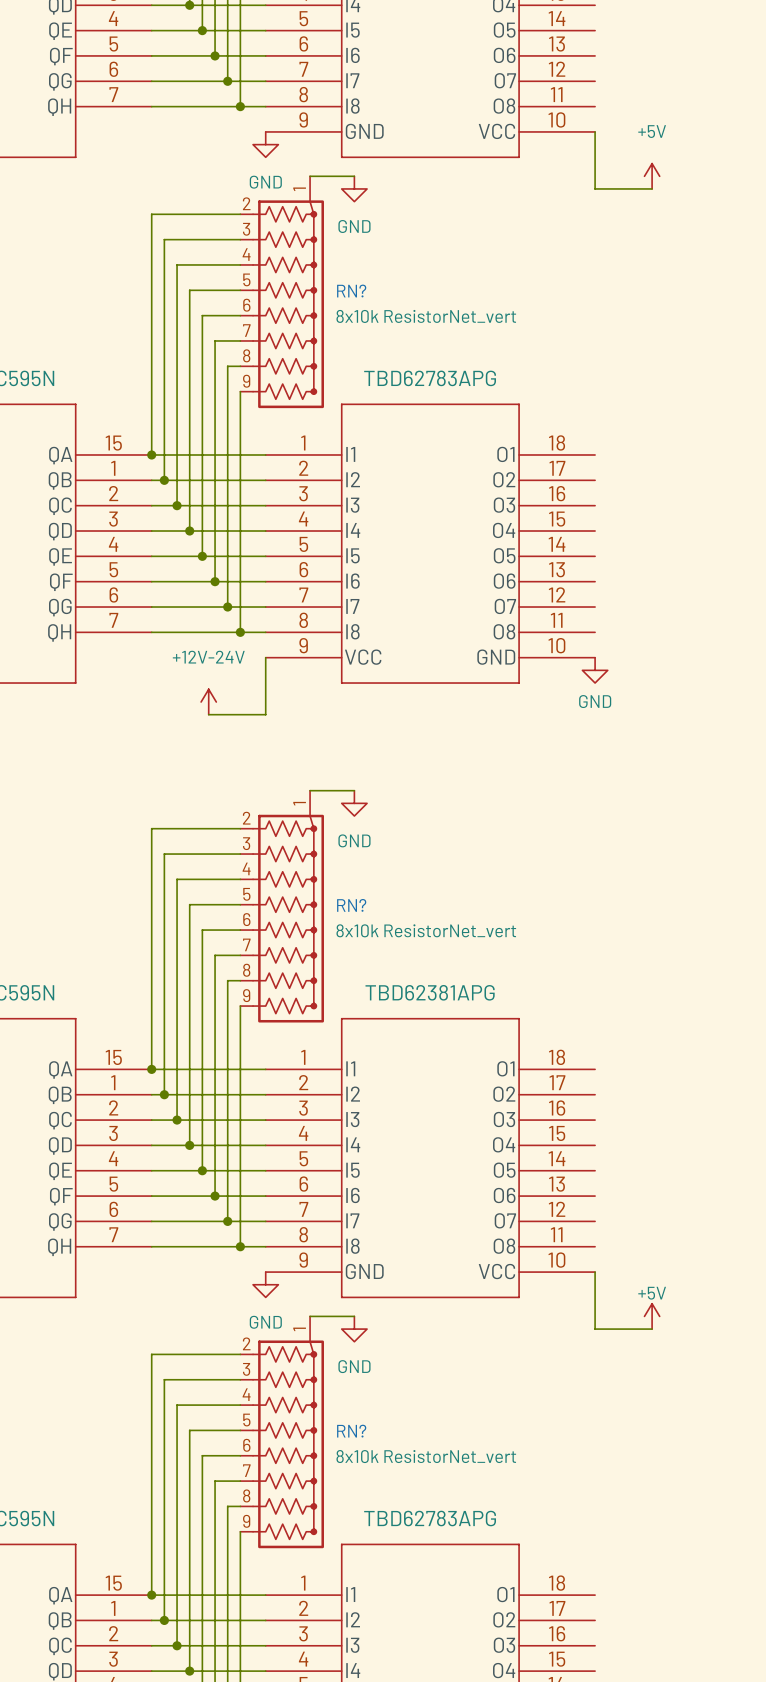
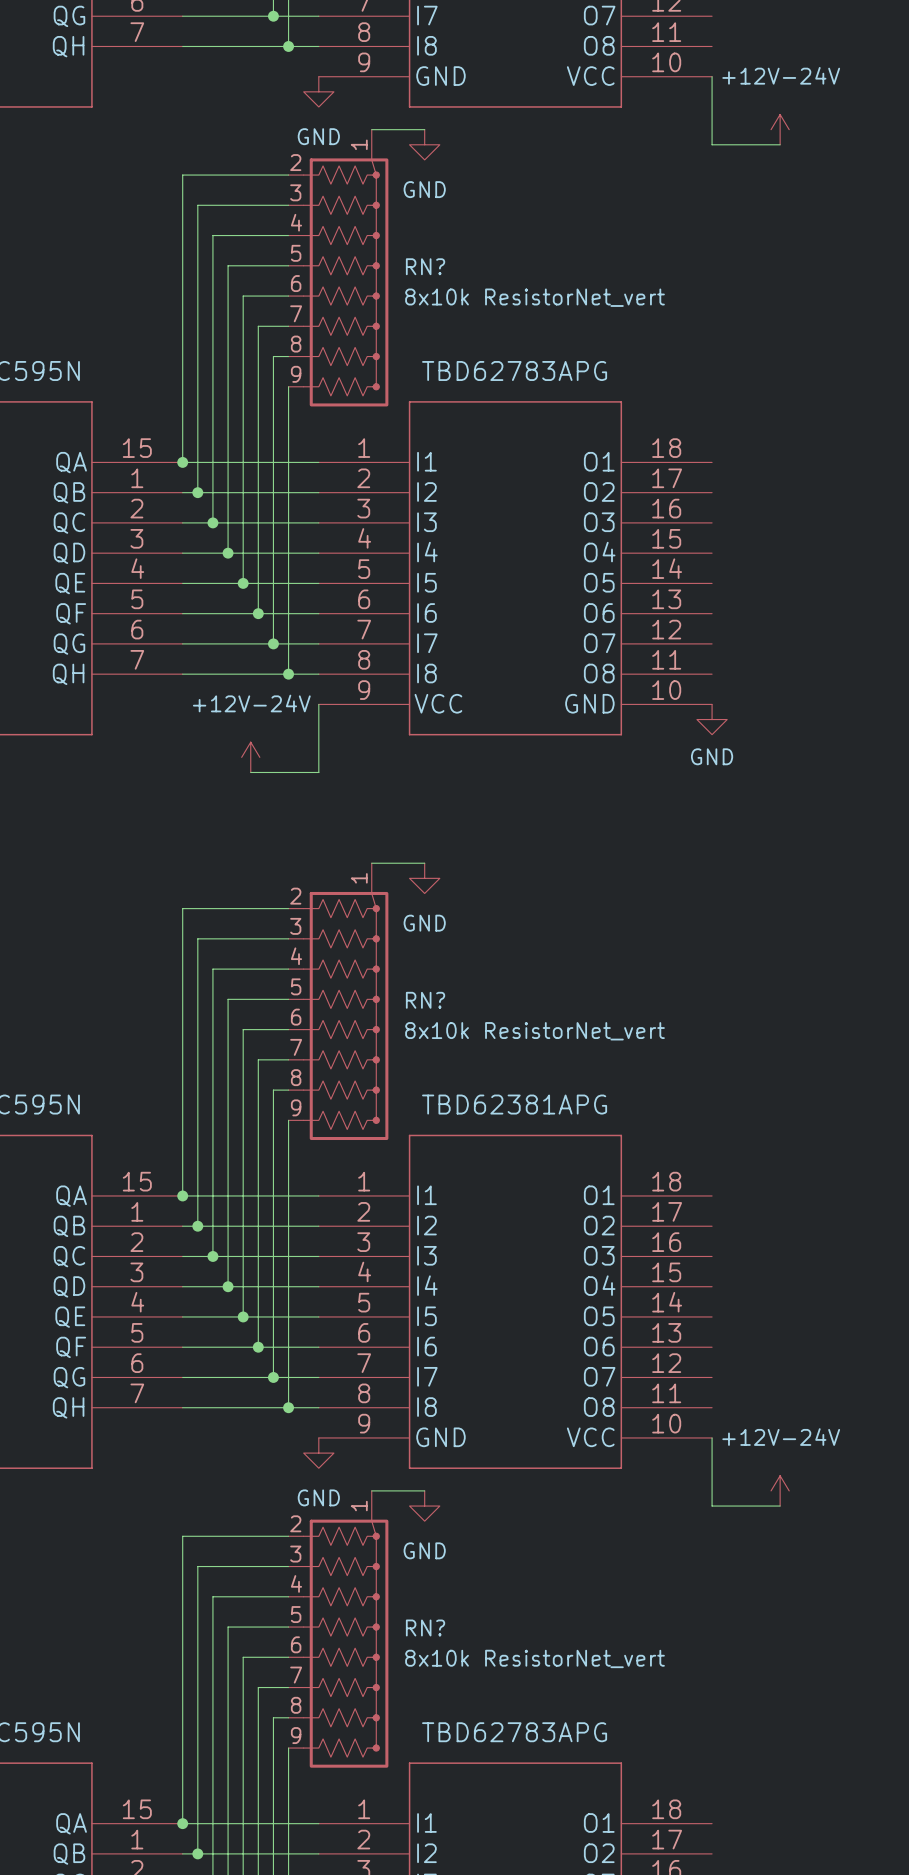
power symbol: +5V (652, 176) -> +12V-24V (780, 129)
power symbol: +5V (652, 1316) -> +12V-24V (780, 1490)

